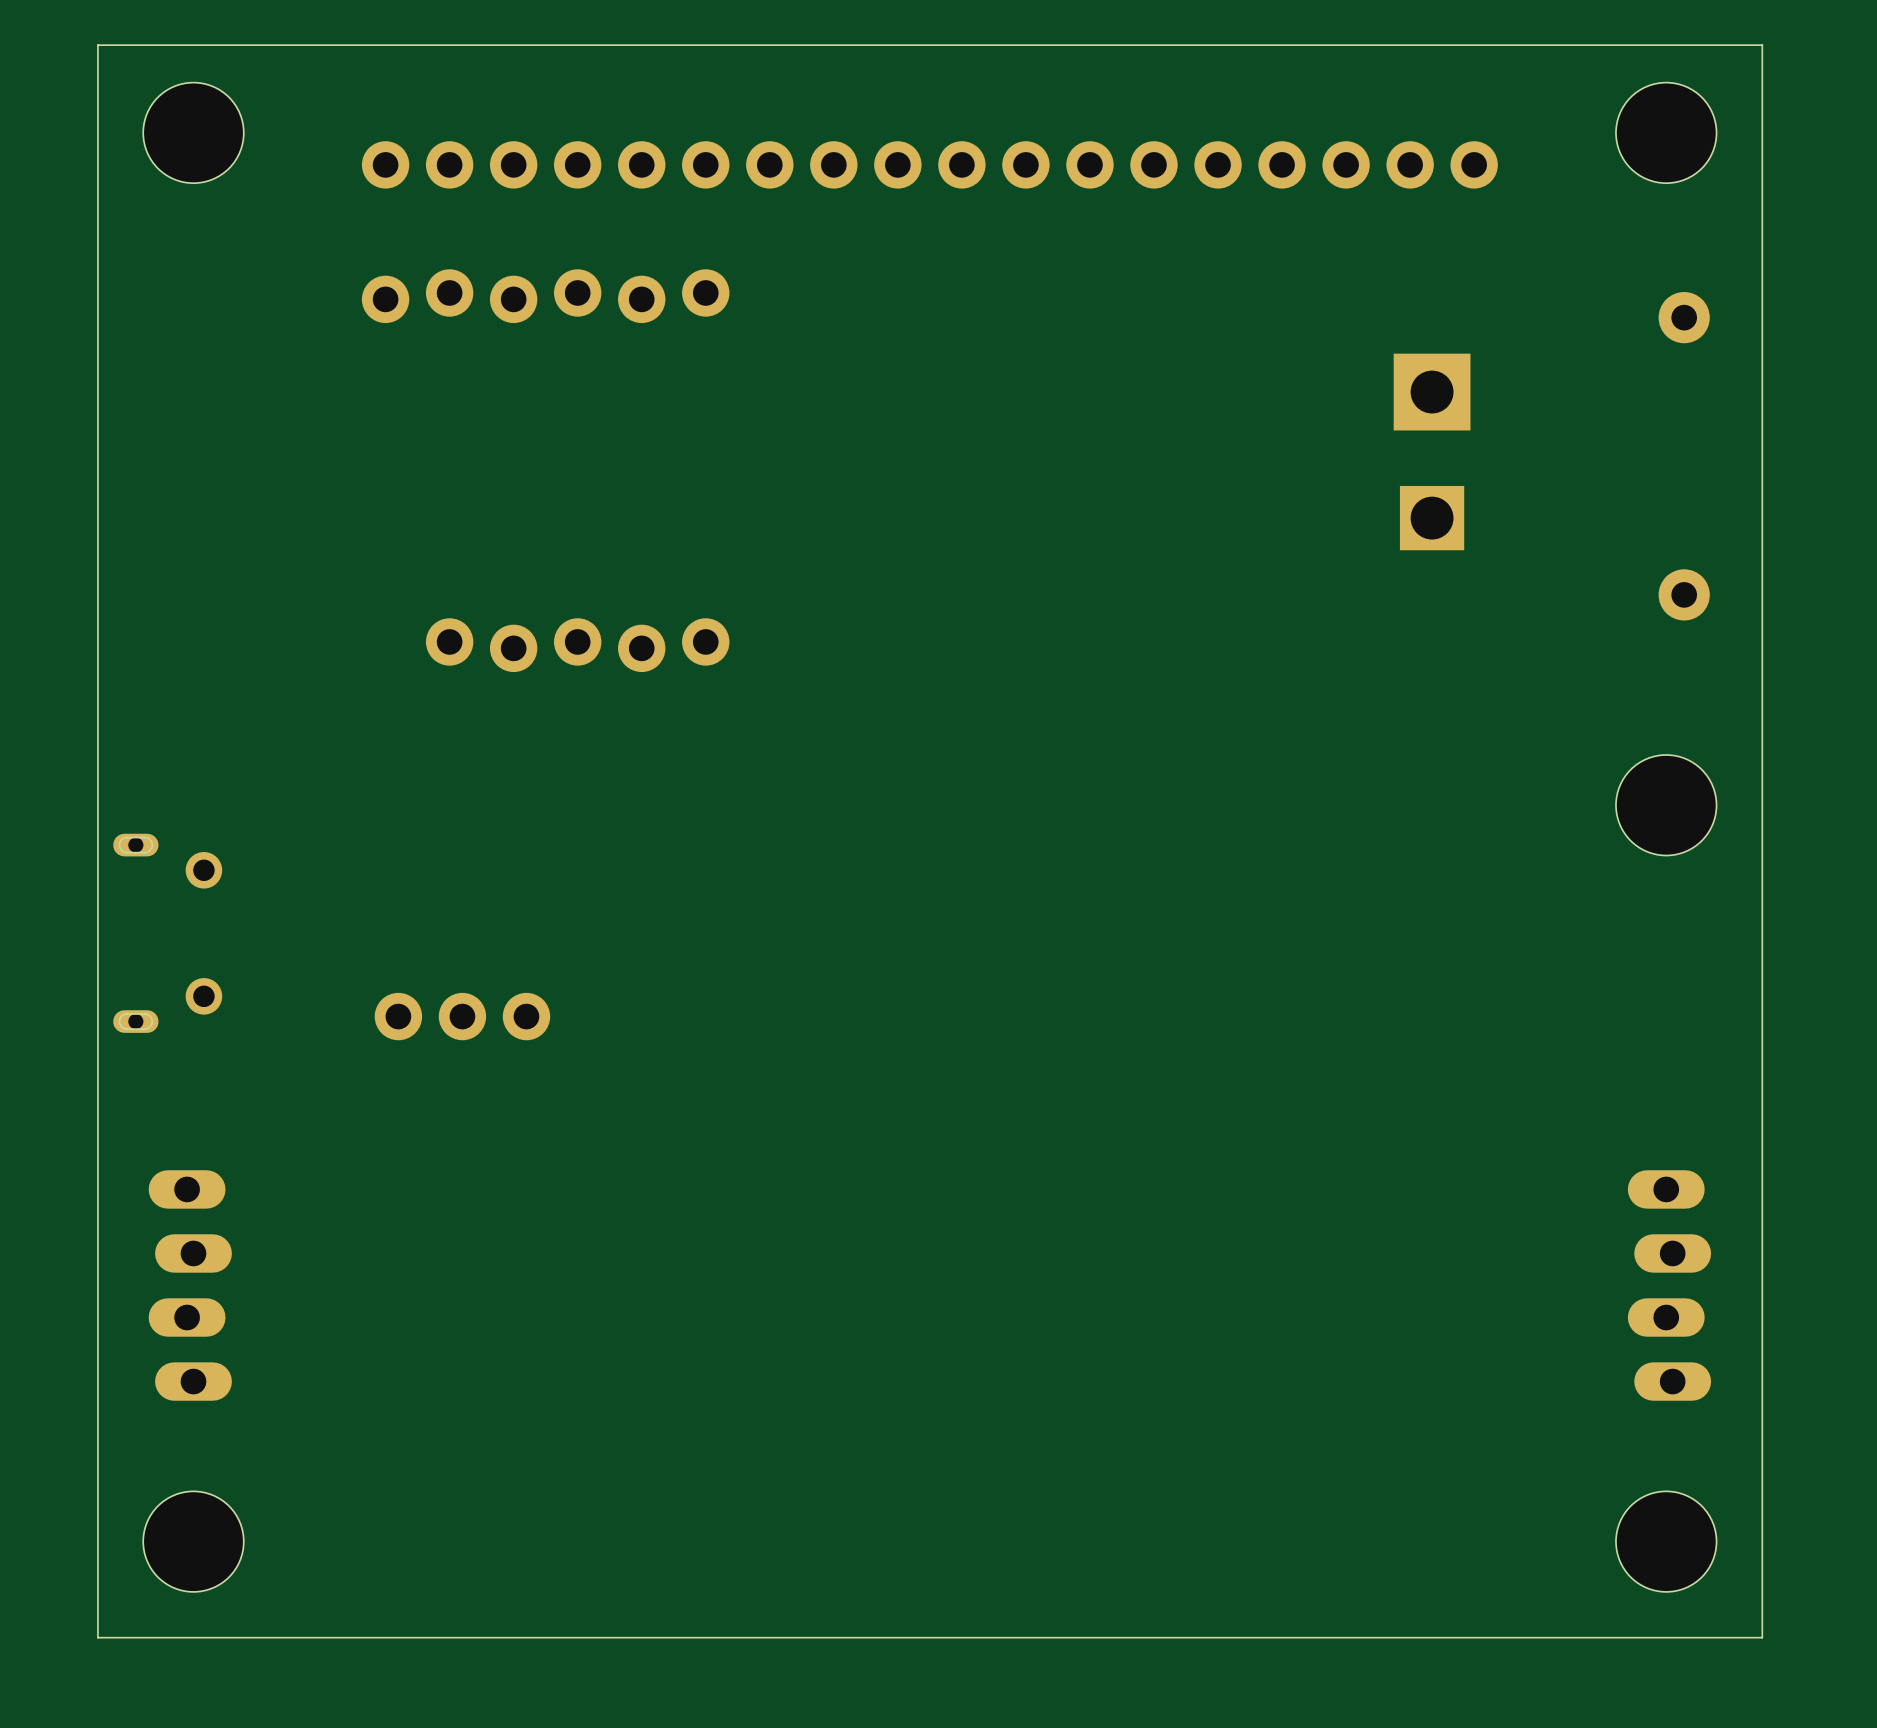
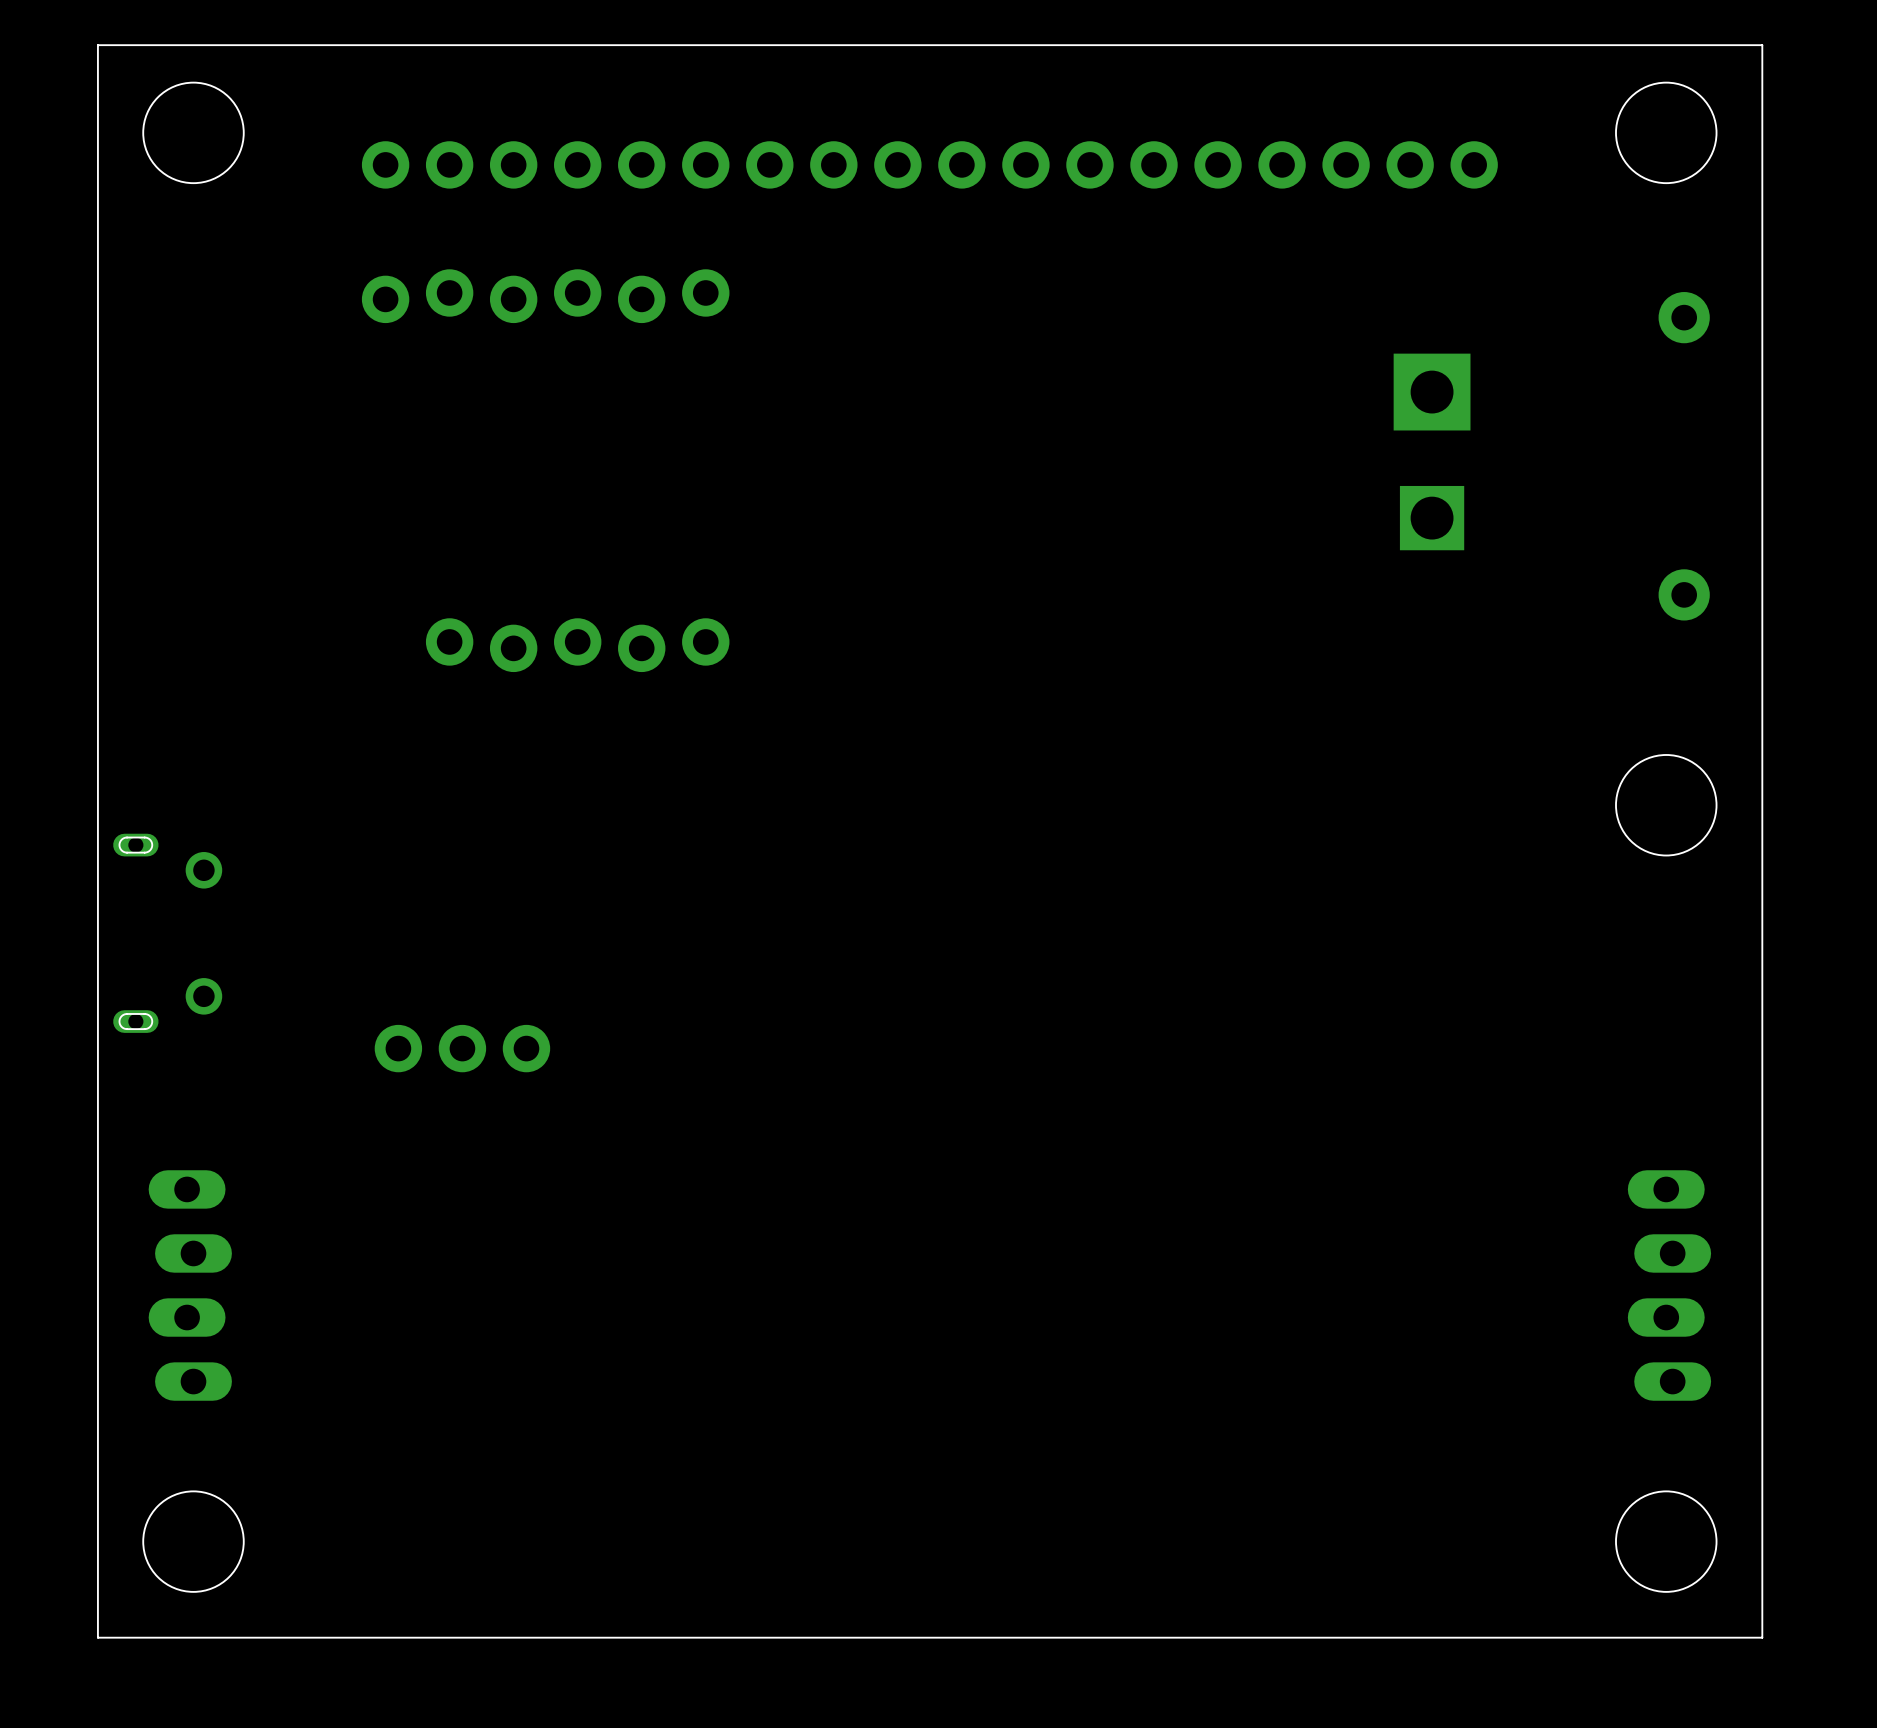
part position: (462, 1016) -> (462, 1048)

